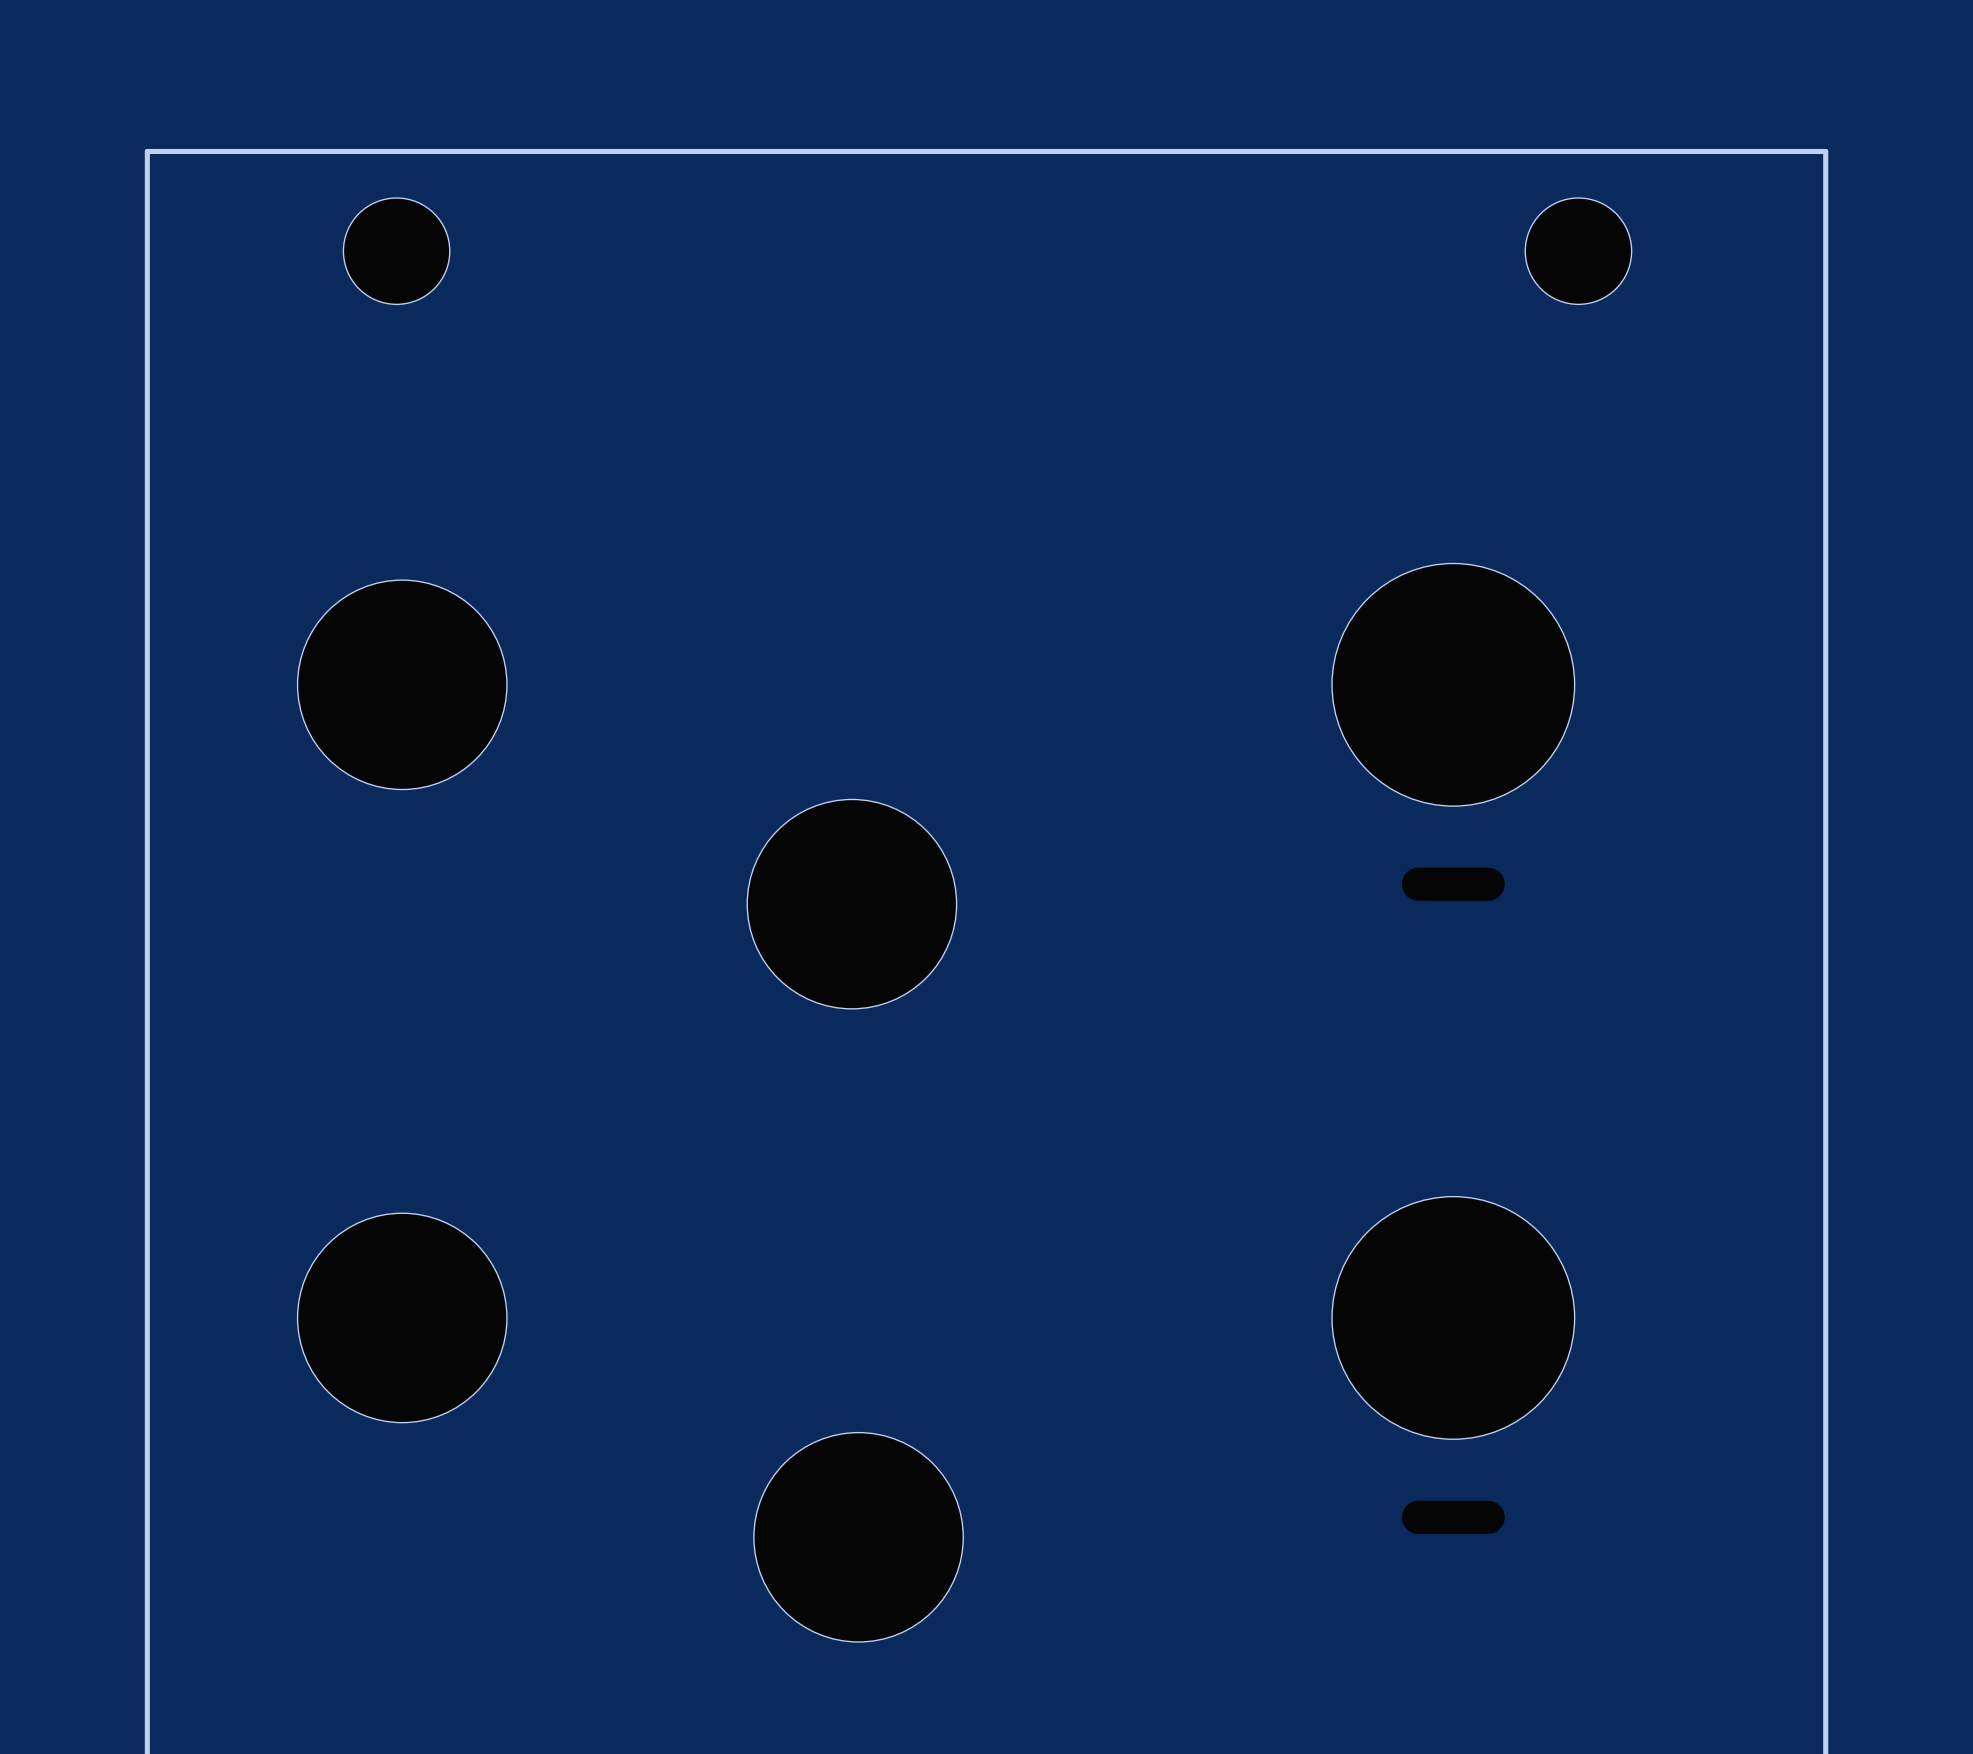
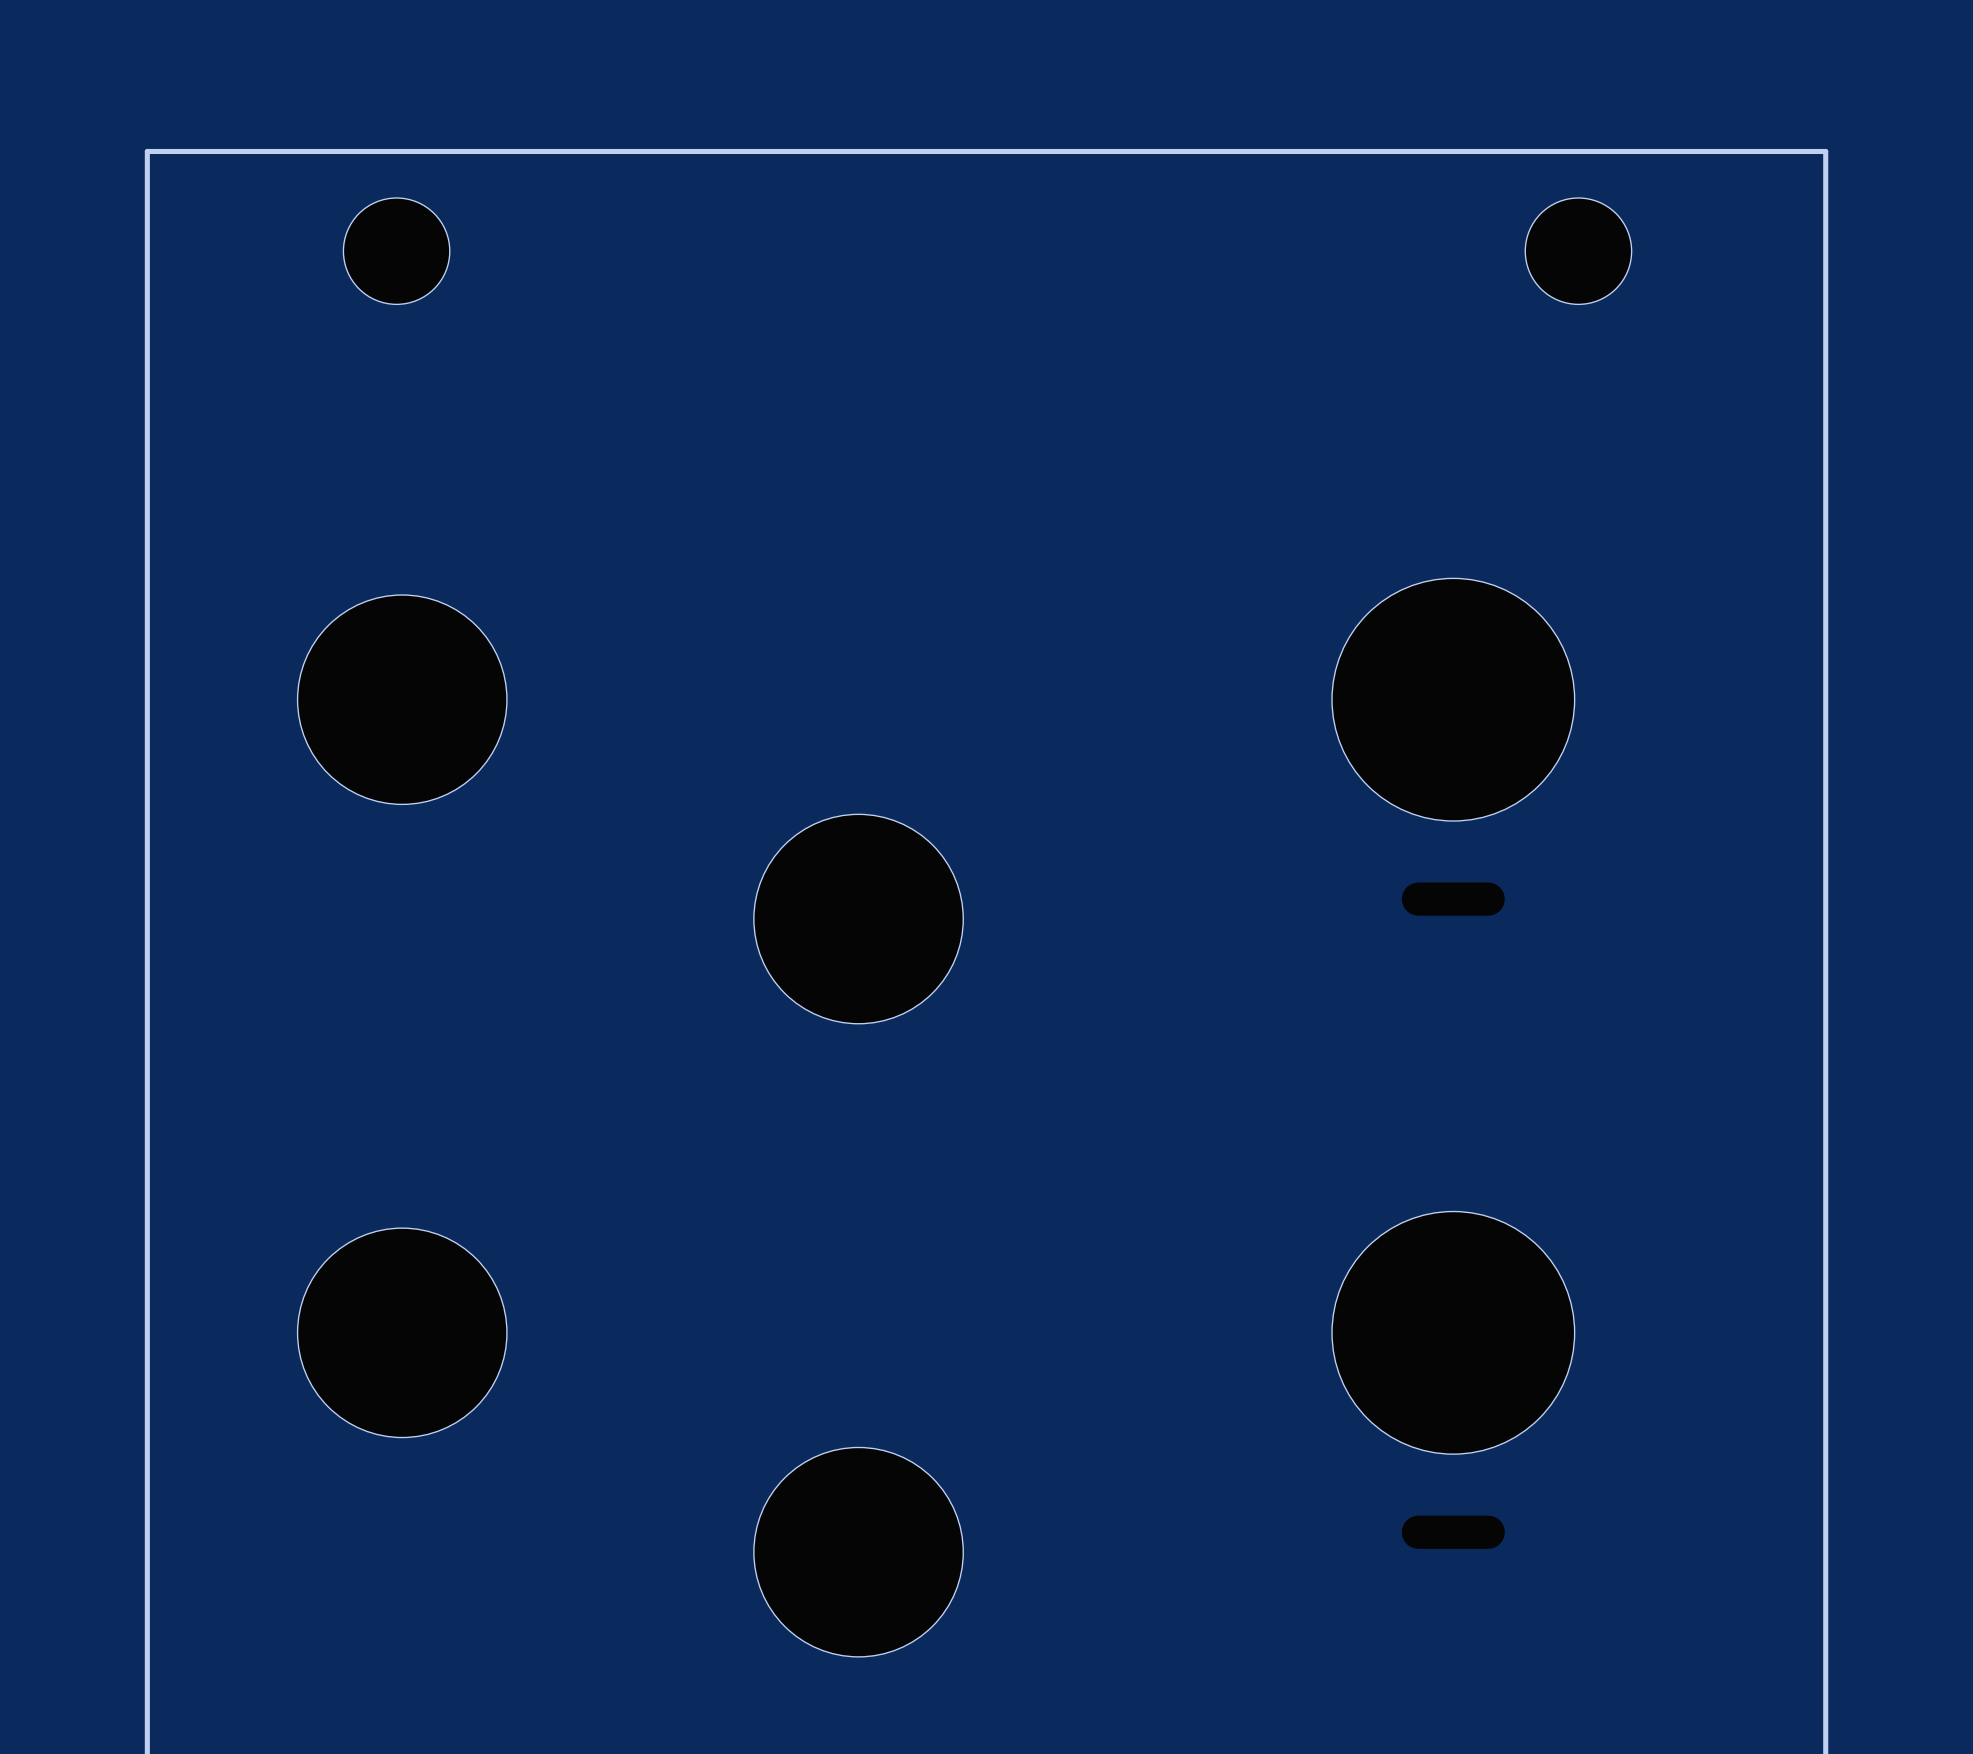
part position: (402, 684) -> (402, 699)
part position: (1453, 732) -> (1453, 747)
part position: (851, 904) -> (858, 919)
part position: (402, 1317) -> (402, 1332)
part position: (1453, 1365) -> (1453, 1380)
part position: (858, 1537) -> (858, 1552)

